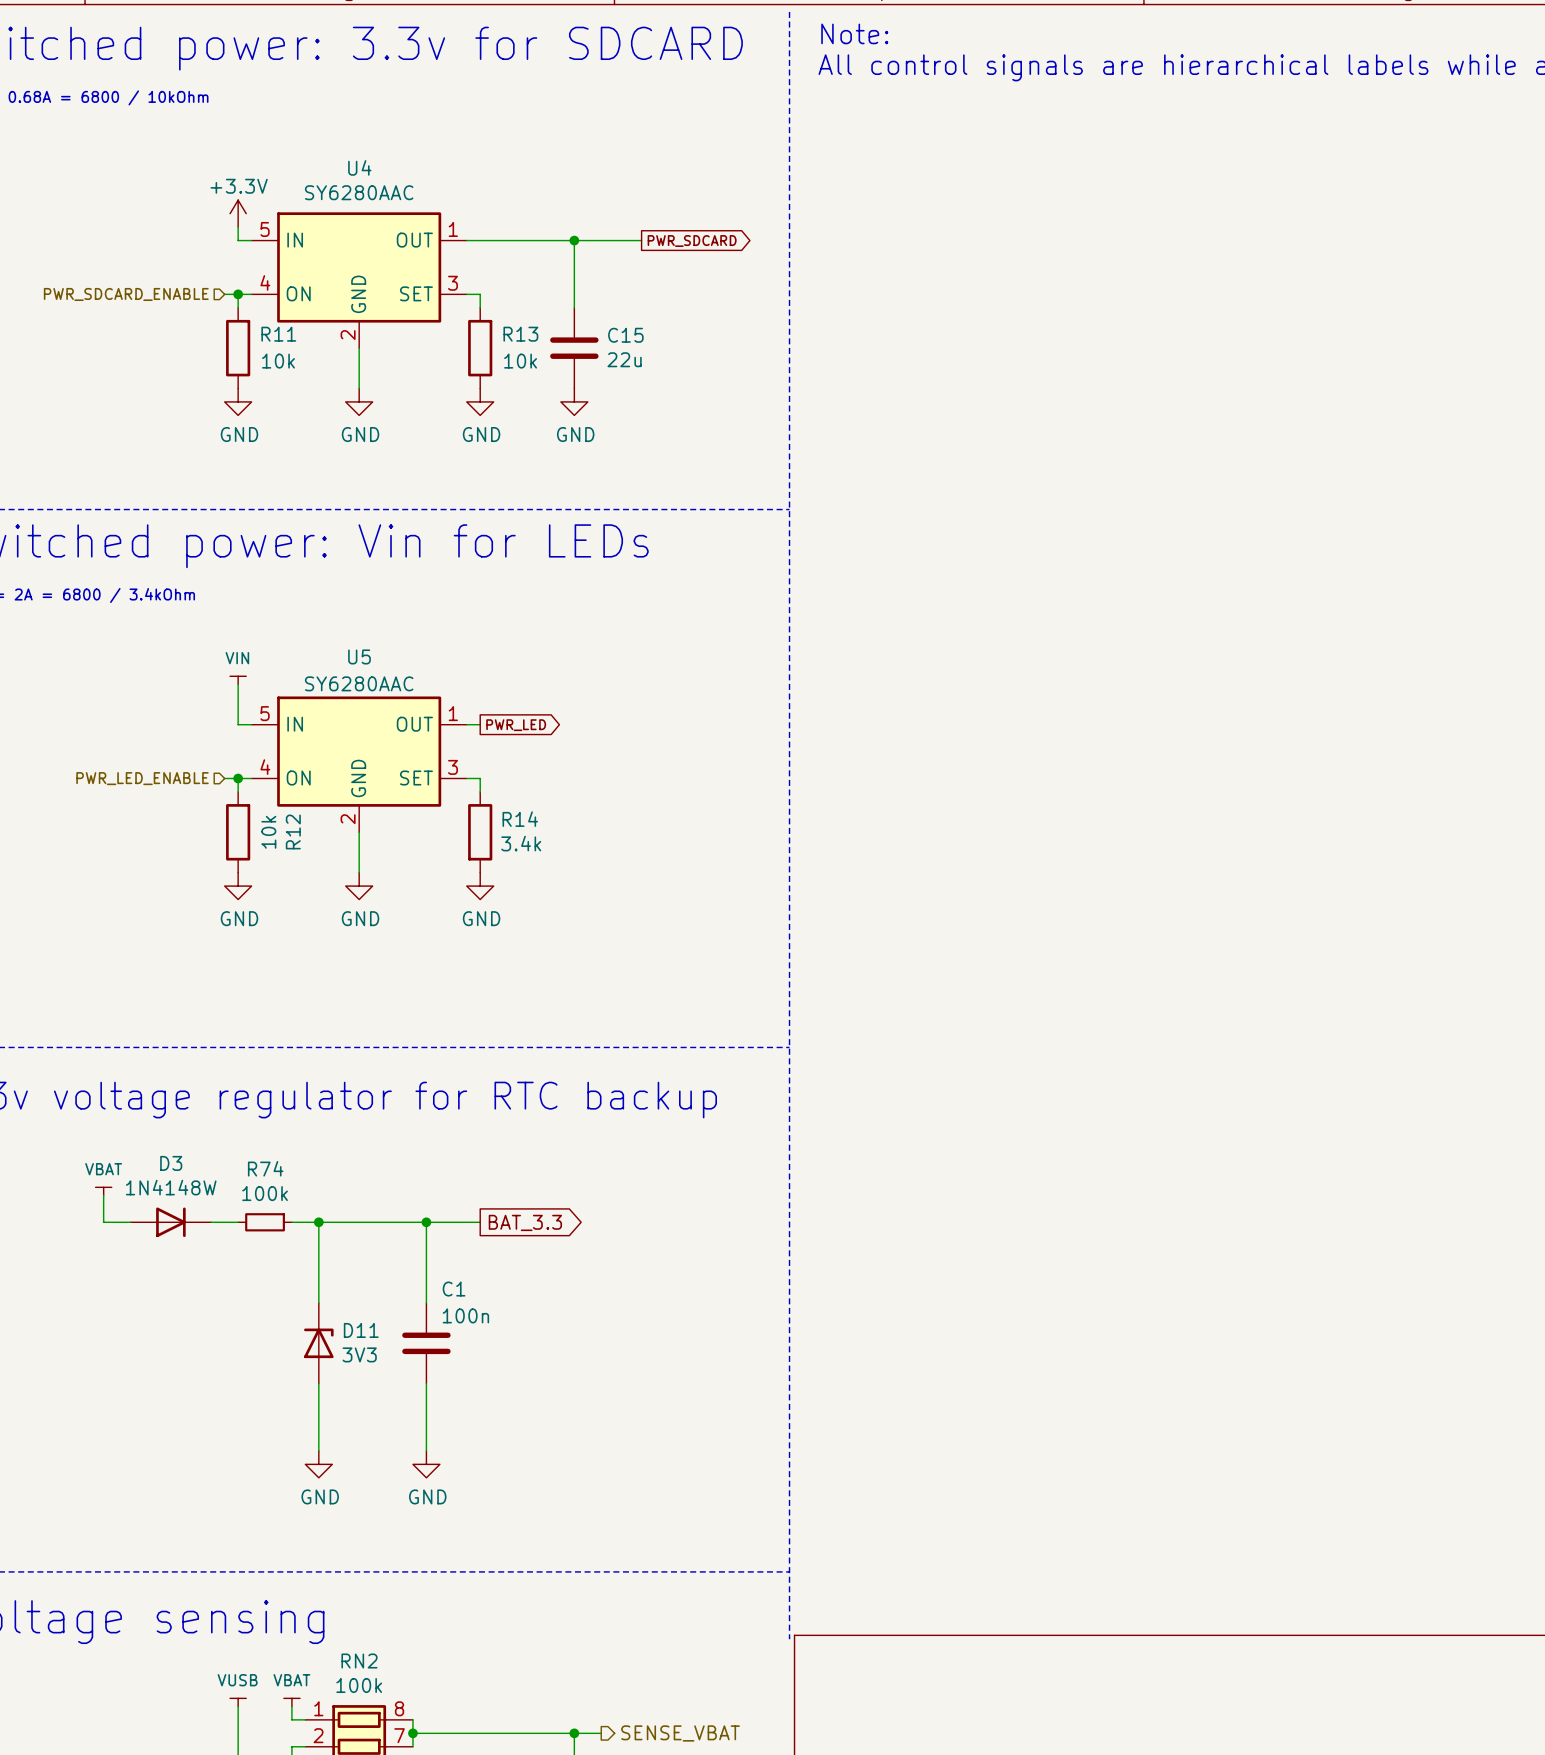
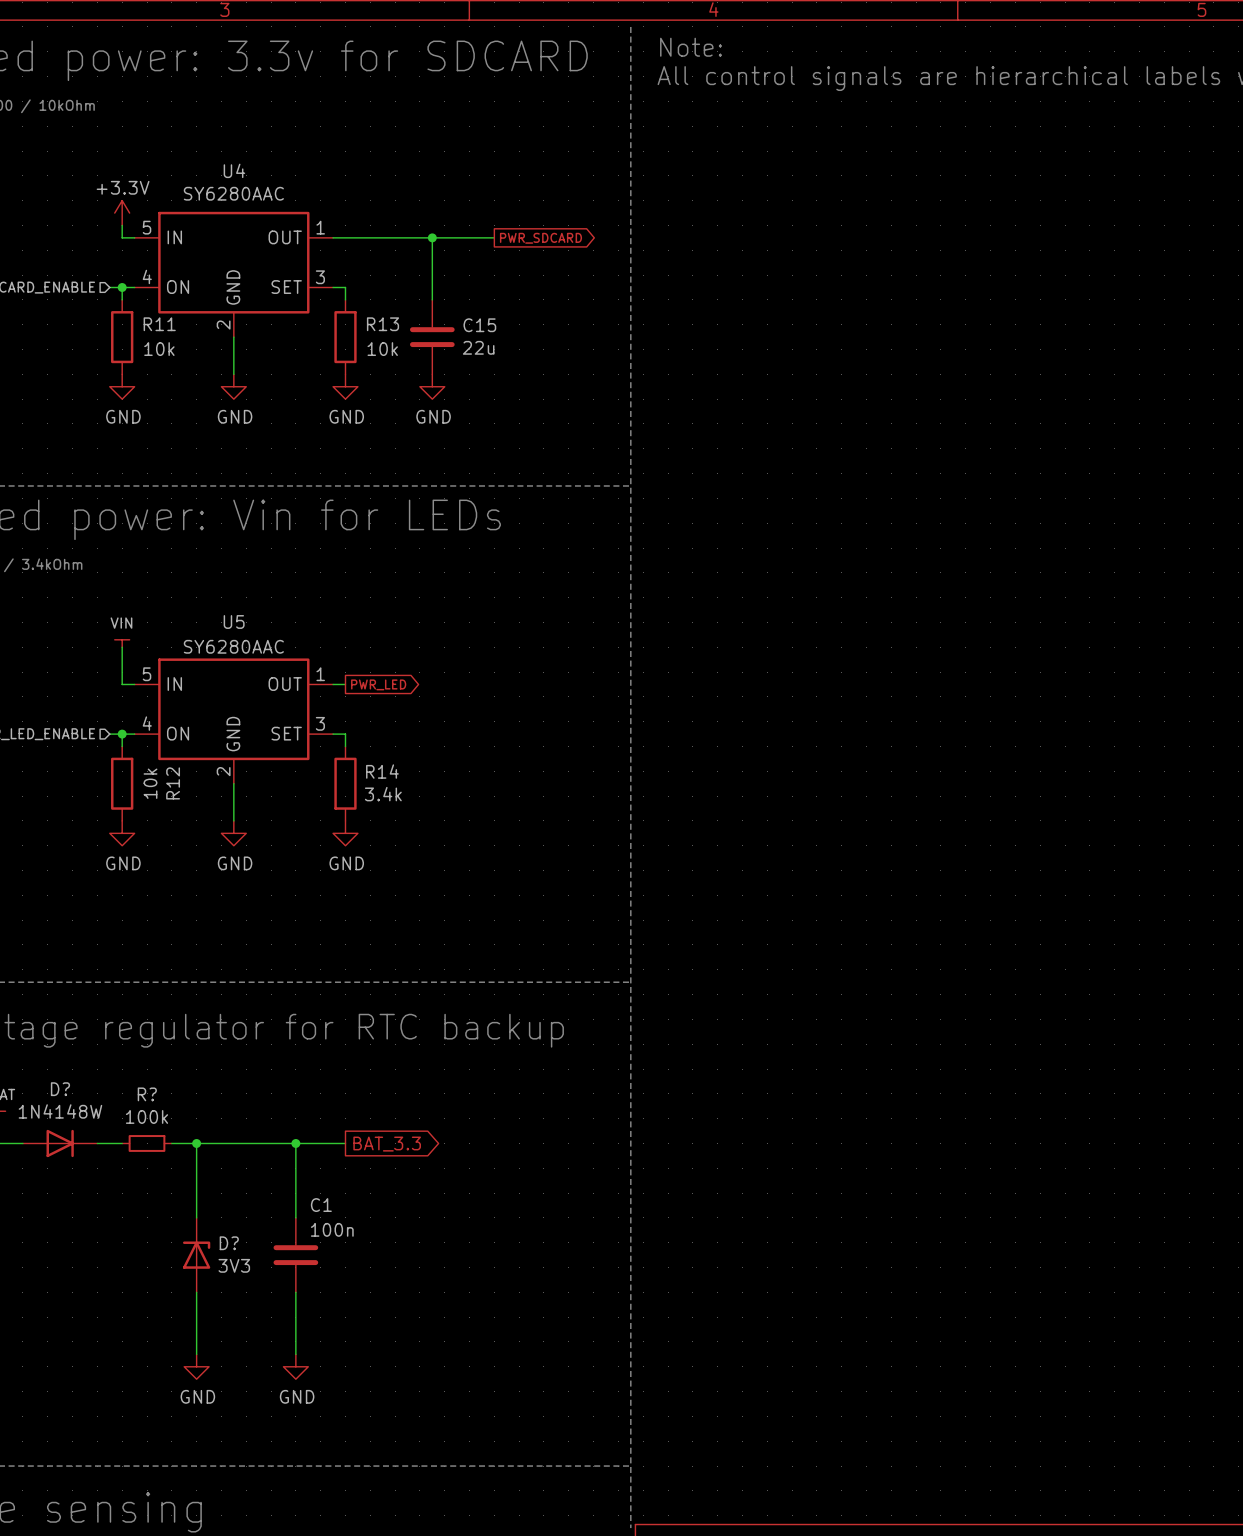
D3 name: D3 (171, 1163) -> D? (60, 1089)
R74 name: R74 (265, 1168) -> R? (147, 1094)
D11 name: D11 (361, 1330) -> D? (229, 1243)

